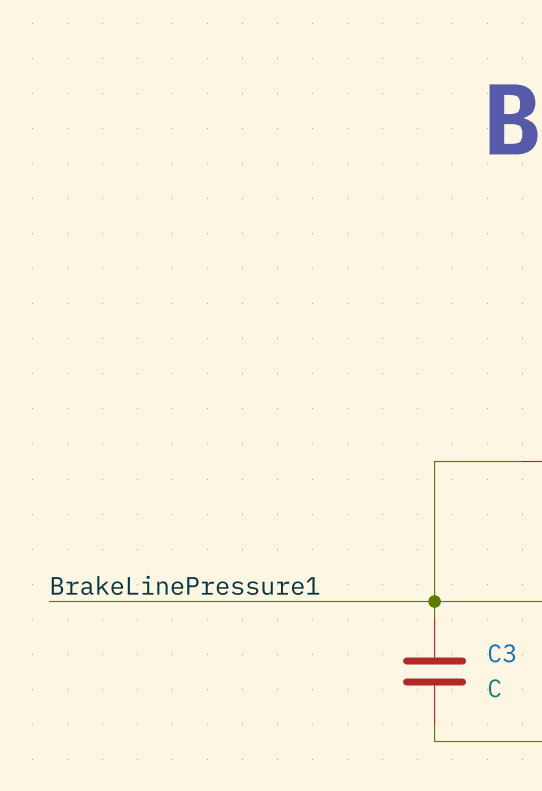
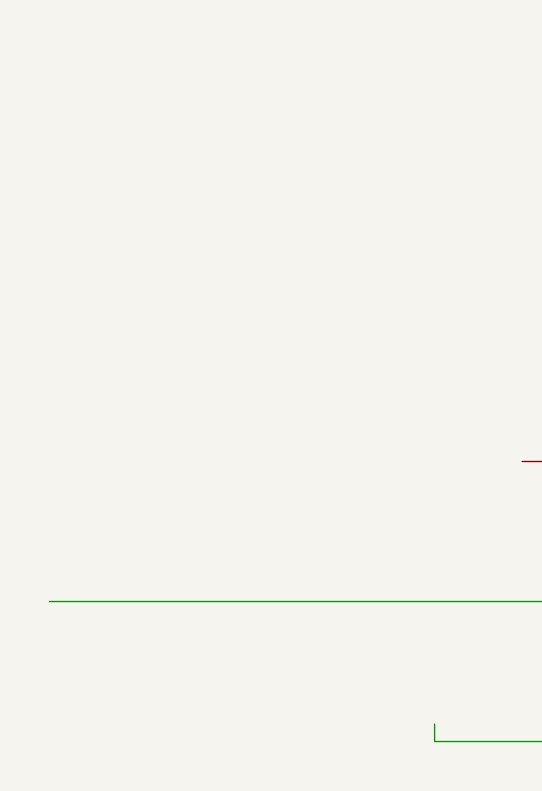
wire: (522, 461) (434, 461) (434, 619) -> none
label: BrakeLinePressure1 (185, 585) -> none
junction: (434, 601) -> none
C3: C (434, 671) -> none

